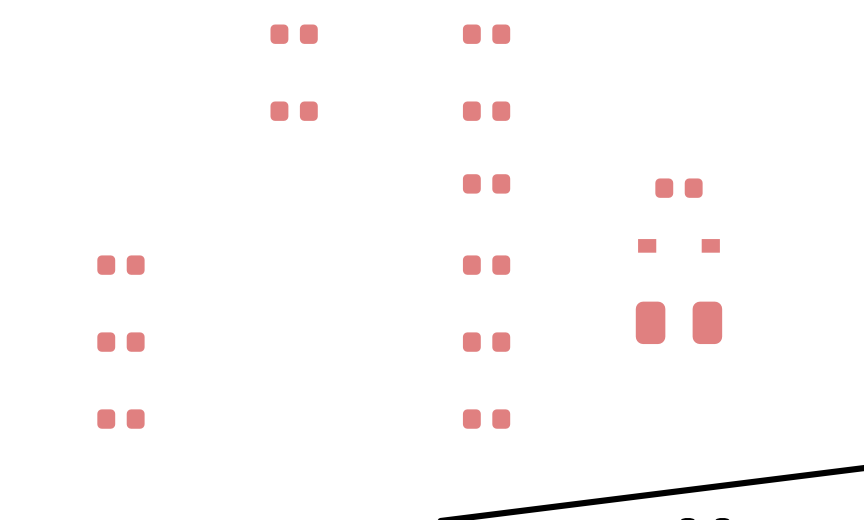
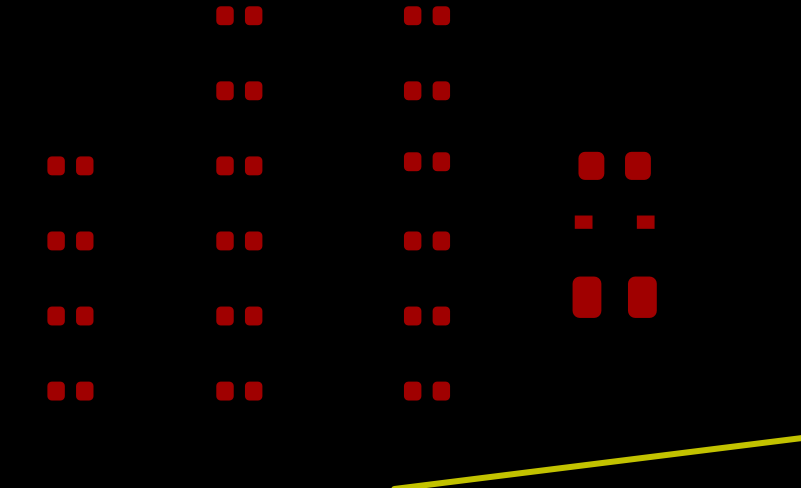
part footprint: [655, 178, 703, 198] -> [578, 151, 651, 180]
part: none -> (70, 165)
part: none -> (239, 165)
part: none -> (239, 240)
part: none -> (239, 316)
part: none -> (239, 391)

